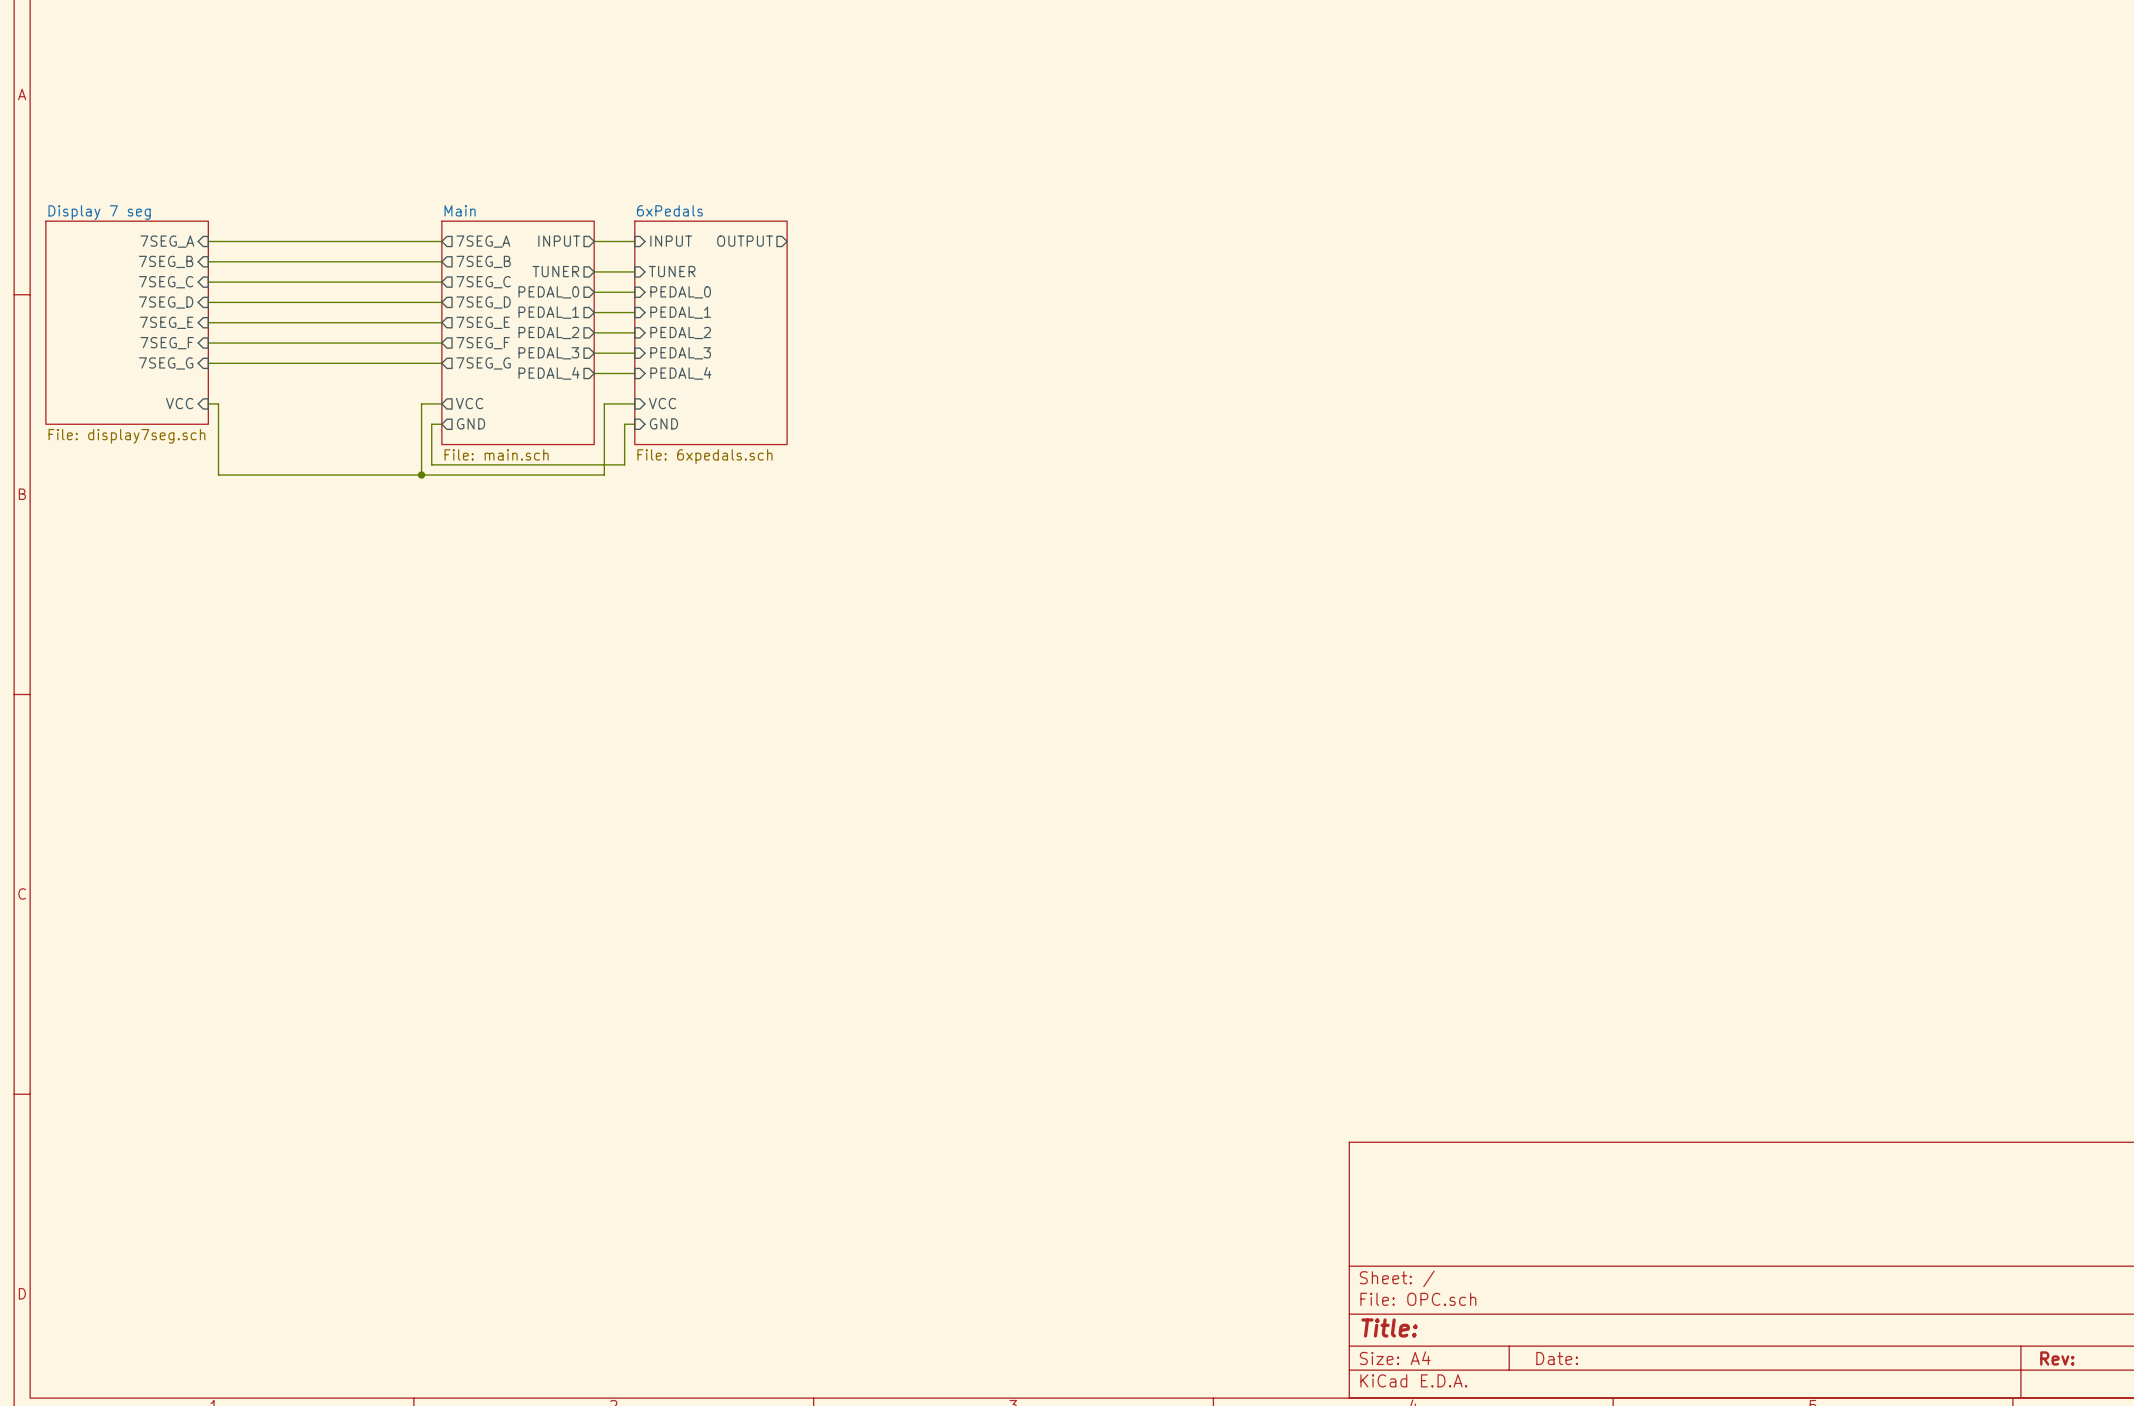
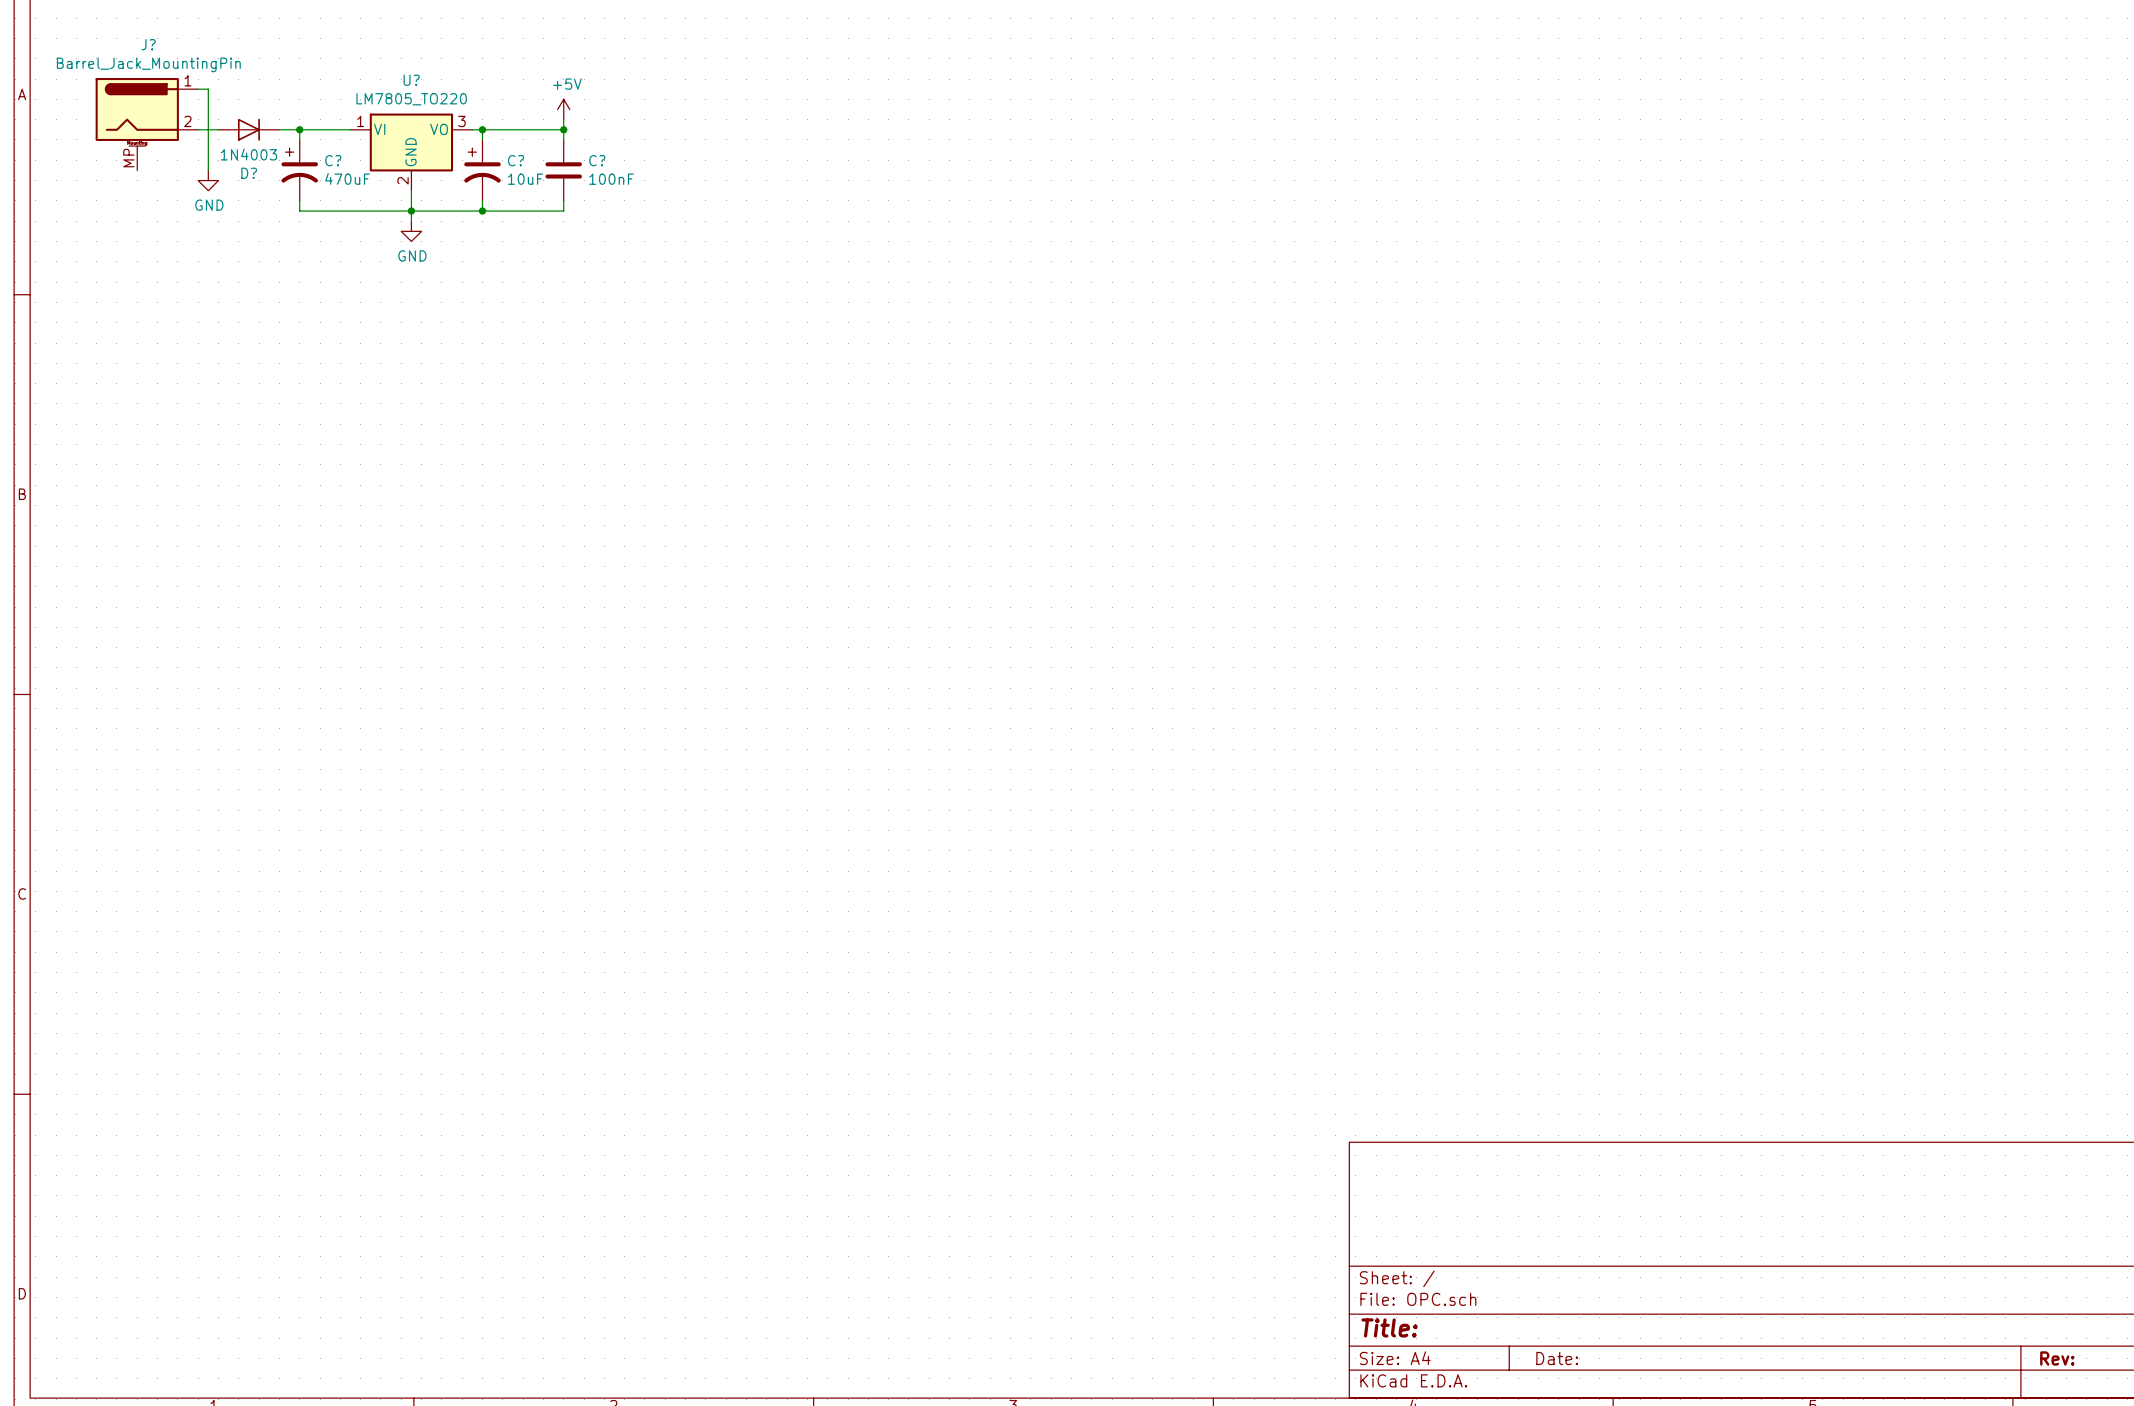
wire: none -> (198, 89) (208, 89) (208, 170)
power symbol: none -> +5V (563, 109)
wire: none -> (563, 119) (563, 139)
J?: none -> Barrel_Jack_MountingPin (146, 124)
wire: none -> (198, 129) (218, 129)
D?: none -> 1N4003 (248, 129)
wire: none -> (279, 129) (350, 129)
wire: none -> (299, 129) (299, 139)
junction: none -> (299, 129)
wire: none -> (472, 129) (563, 129)
wire: none -> (482, 129) (482, 139)
junction: none -> (482, 129)
junction: none -> (563, 129)
U?: none -> LM7805_TO220 (411, 152)
C?: none -> 470uF (299, 170)
C?: none -> 10uF (482, 170)
C?: none -> 100nF (563, 170)
power symbol: none -> GND (208, 180)
wire: none -> (411, 190) (411, 221)
wire: none -> (299, 200) (299, 211) (563, 211) (563, 200)
wire: none -> (482, 200) (482, 211)
junction: none -> (411, 211)
junction: none -> (482, 211)
power symbol: none -> GND (411, 231)
sheet pin: 7SEG_A (167, 241) -> none
wire: (208, 241) (441, 241) -> none
sheet pin: 7SEG_A (483, 241) -> none
sheet pin: INPUT (559, 241) -> none
wire: (594, 241) (634, 241) -> none
sheet pin: INPUT (671, 241) -> none
sheet pin: OUTPUT (745, 241) -> none
sheet pin: 7SEG_B (166, 261) -> none
wire: (208, 261) (441, 261) -> none
sheet pin: 7SEG_B (483, 261) -> none
sheet pin: TUNER (555, 271) -> none
wire: (594, 271) (634, 271) -> none
sheet pin: TUNER (672, 271) -> none
sheet pin: 7SEG_C (166, 282) -> none
wire: (208, 282) (441, 282) -> none
sheet pin: 7SEG_C (483, 282) -> none
sheet pin: PEDAL_0 (548, 292) -> none
wire: (594, 292) (634, 292) -> none
sheet pin: PEDAL_0 (680, 292) -> none
sheet pin: 7SEG_D (166, 302) -> none
wire: (208, 302) (441, 302) -> none
sheet pin: 7SEG_D (483, 302) -> none
sheet pin: PEDAL_1 (548, 312) -> none
wire: (594, 312) (634, 312) -> none
sheet pin: PEDAL_1 (680, 312) -> none
sheet Display 7 seg: File: display7seg.sch (127, 322) -> none
sheet pin: 7SEG_E (166, 322) -> none
wire: (208, 322) (441, 322) -> none
sheet pin: 7SEG_E (483, 322) -> none
sheet Main: File: main.sch (518, 332) -> none
sheet pin: PEDAL_2 (548, 332) -> none
wire: (594, 332) (634, 332) -> none
sheet pin: PEDAL_2 (680, 332) -> none
sheet 6xPedals: File: 6xpedals.sch (710, 332) -> none
sheet pin: 7SEG_F (167, 343) -> none
wire: (208, 343) (441, 343) -> none
sheet pin: 7SEG_F (483, 343) -> none
sheet pin: PEDAL_3 (548, 353) -> none
wire: (594, 353) (634, 353) -> none
sheet pin: PEDAL_3 (680, 353) -> none
sheet pin: 7SEG_G (166, 363) -> none
wire: (208, 363) (441, 363) -> none
sheet pin: 7SEG_G (483, 363) -> none
sheet pin: PEDAL_4 (549, 373) -> none
wire: (594, 373) (634, 373) -> none
sheet pin: PEDAL_4 (680, 373) -> none
sheet pin: VCC (179, 403) -> none
wire: (208, 403) (218, 403) (218, 475) (604, 475) (604, 403) (634, 403) -> none
wire: (441, 403) (421, 403) (421, 475) -> none
sheet pin: VCC (469, 403) -> none
sheet pin: VCC (662, 403) -> none
sheet pin: GND (471, 423) -> none
sheet pin: GND (663, 423) -> none
wire: (441, 424) (431, 424) (431, 464) (624, 464) (624, 424) (634, 424) -> none
junction: (421, 475) -> none

